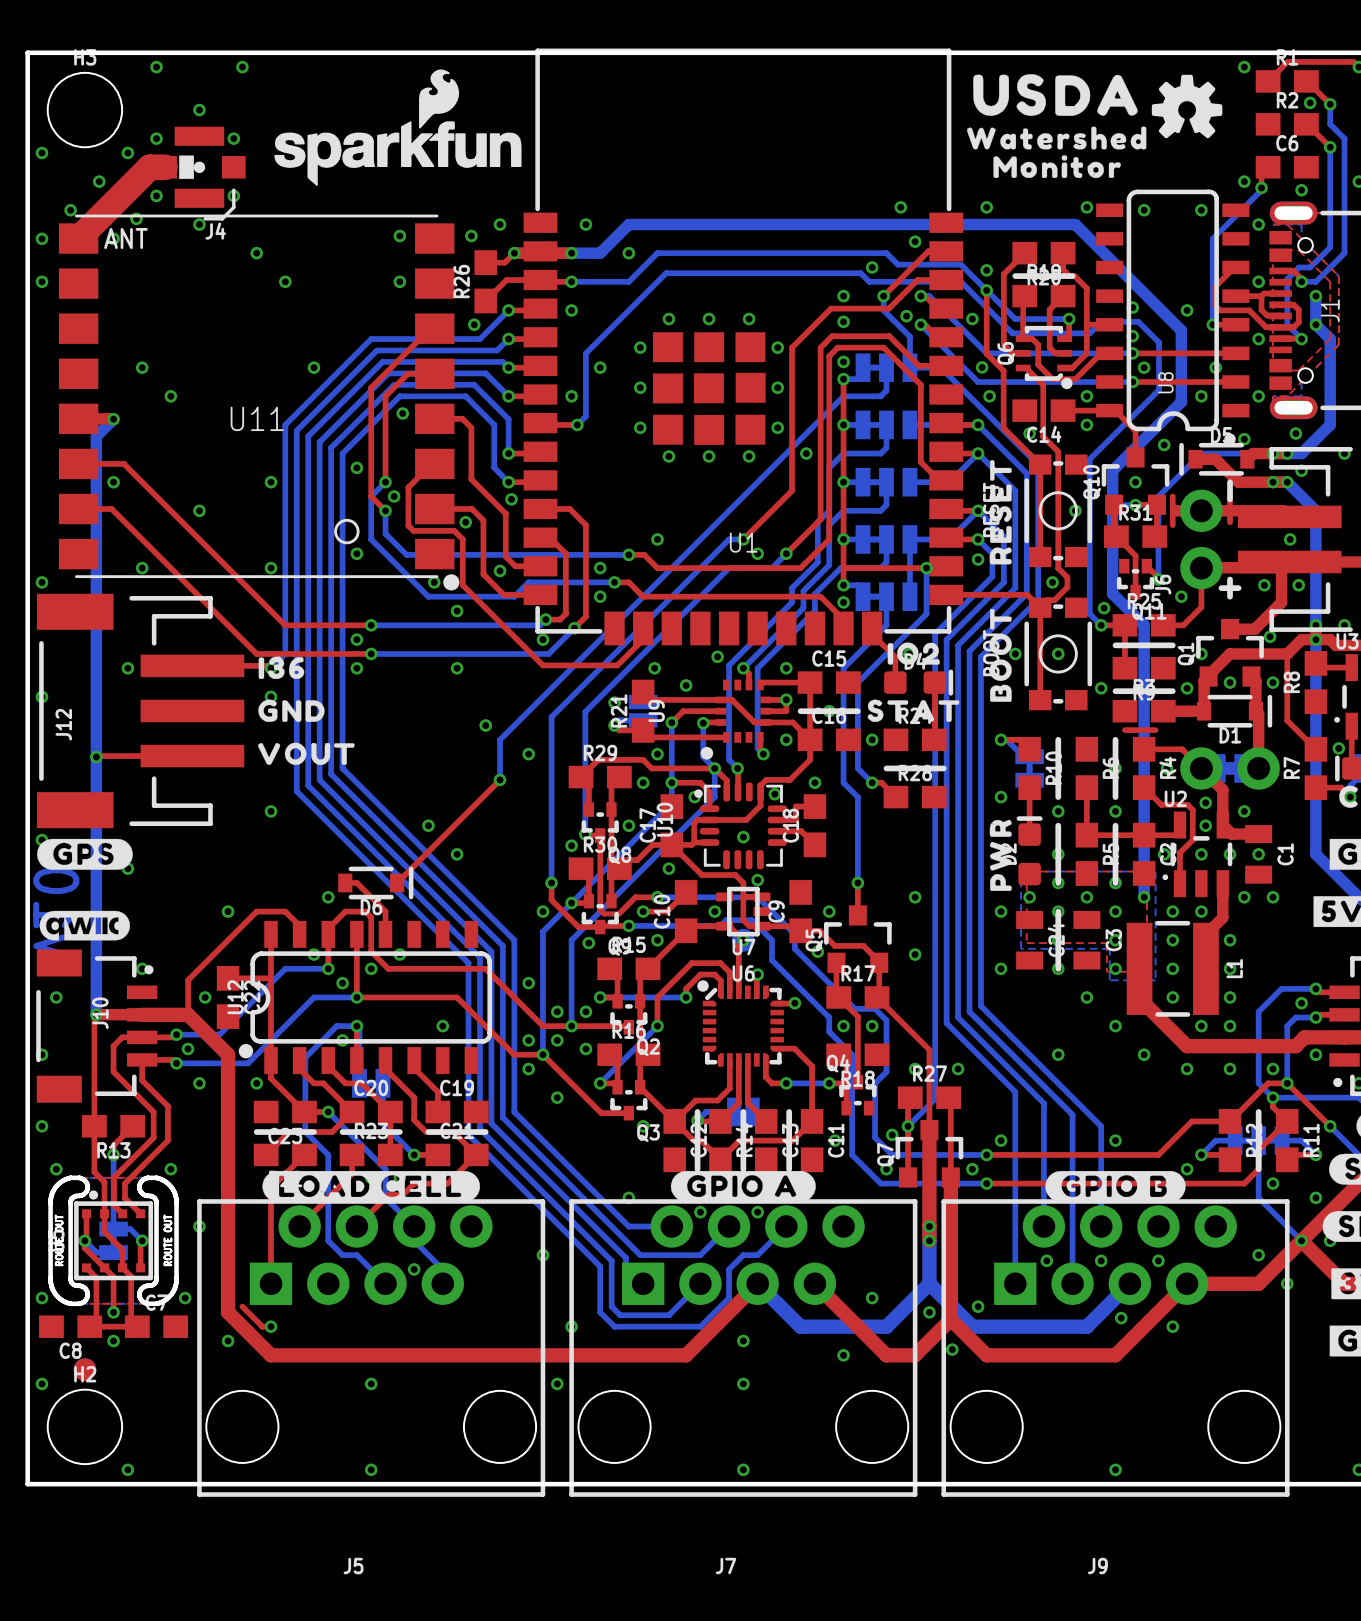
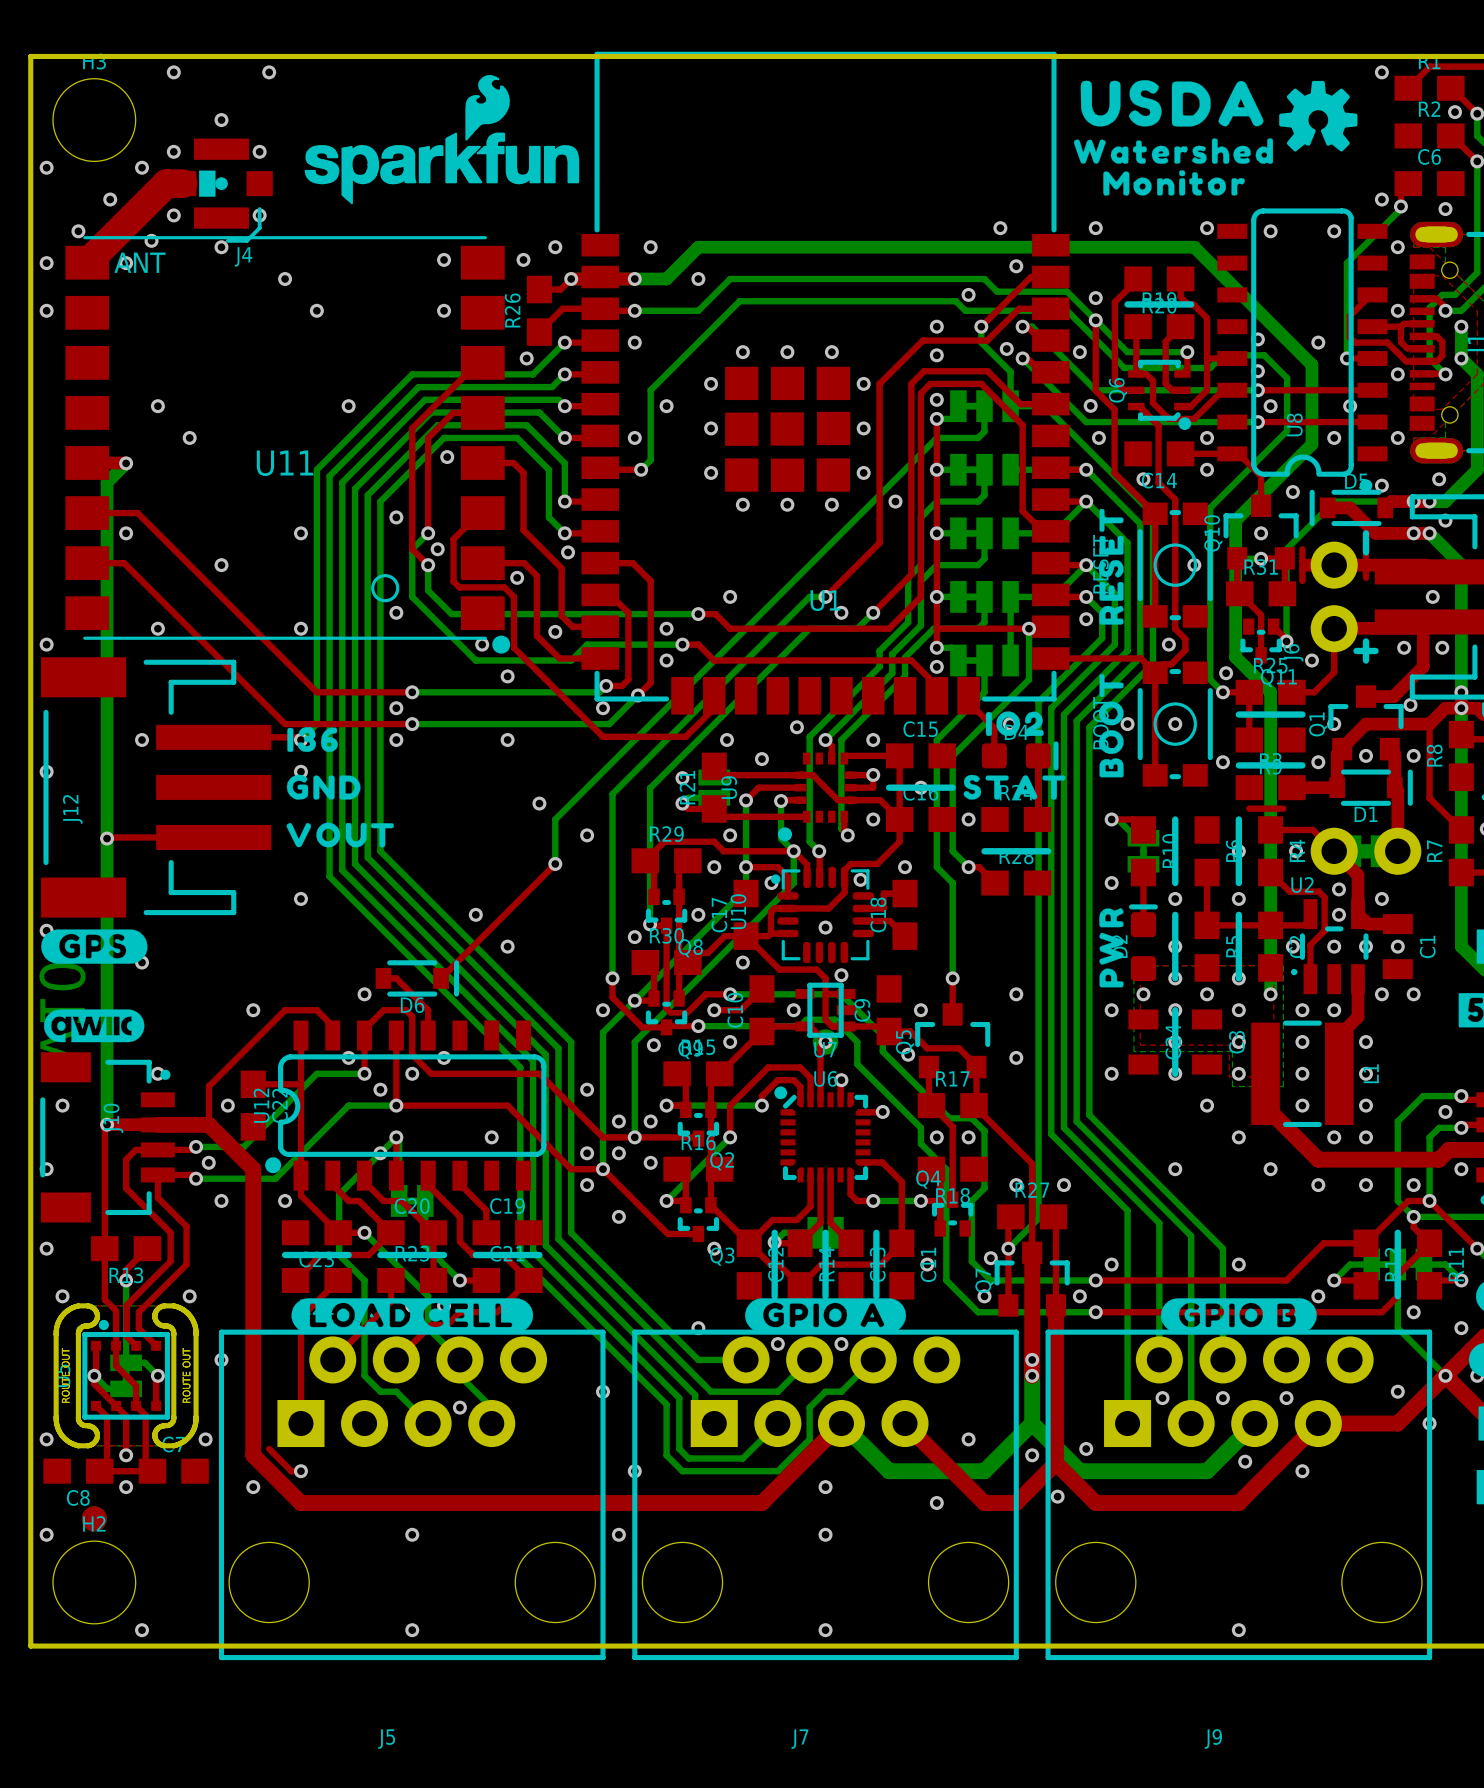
bottom track: (356, 1026) (336, 1026) (305, 1057) (305, 1077) -> (396, 1137) (339, 1194)

